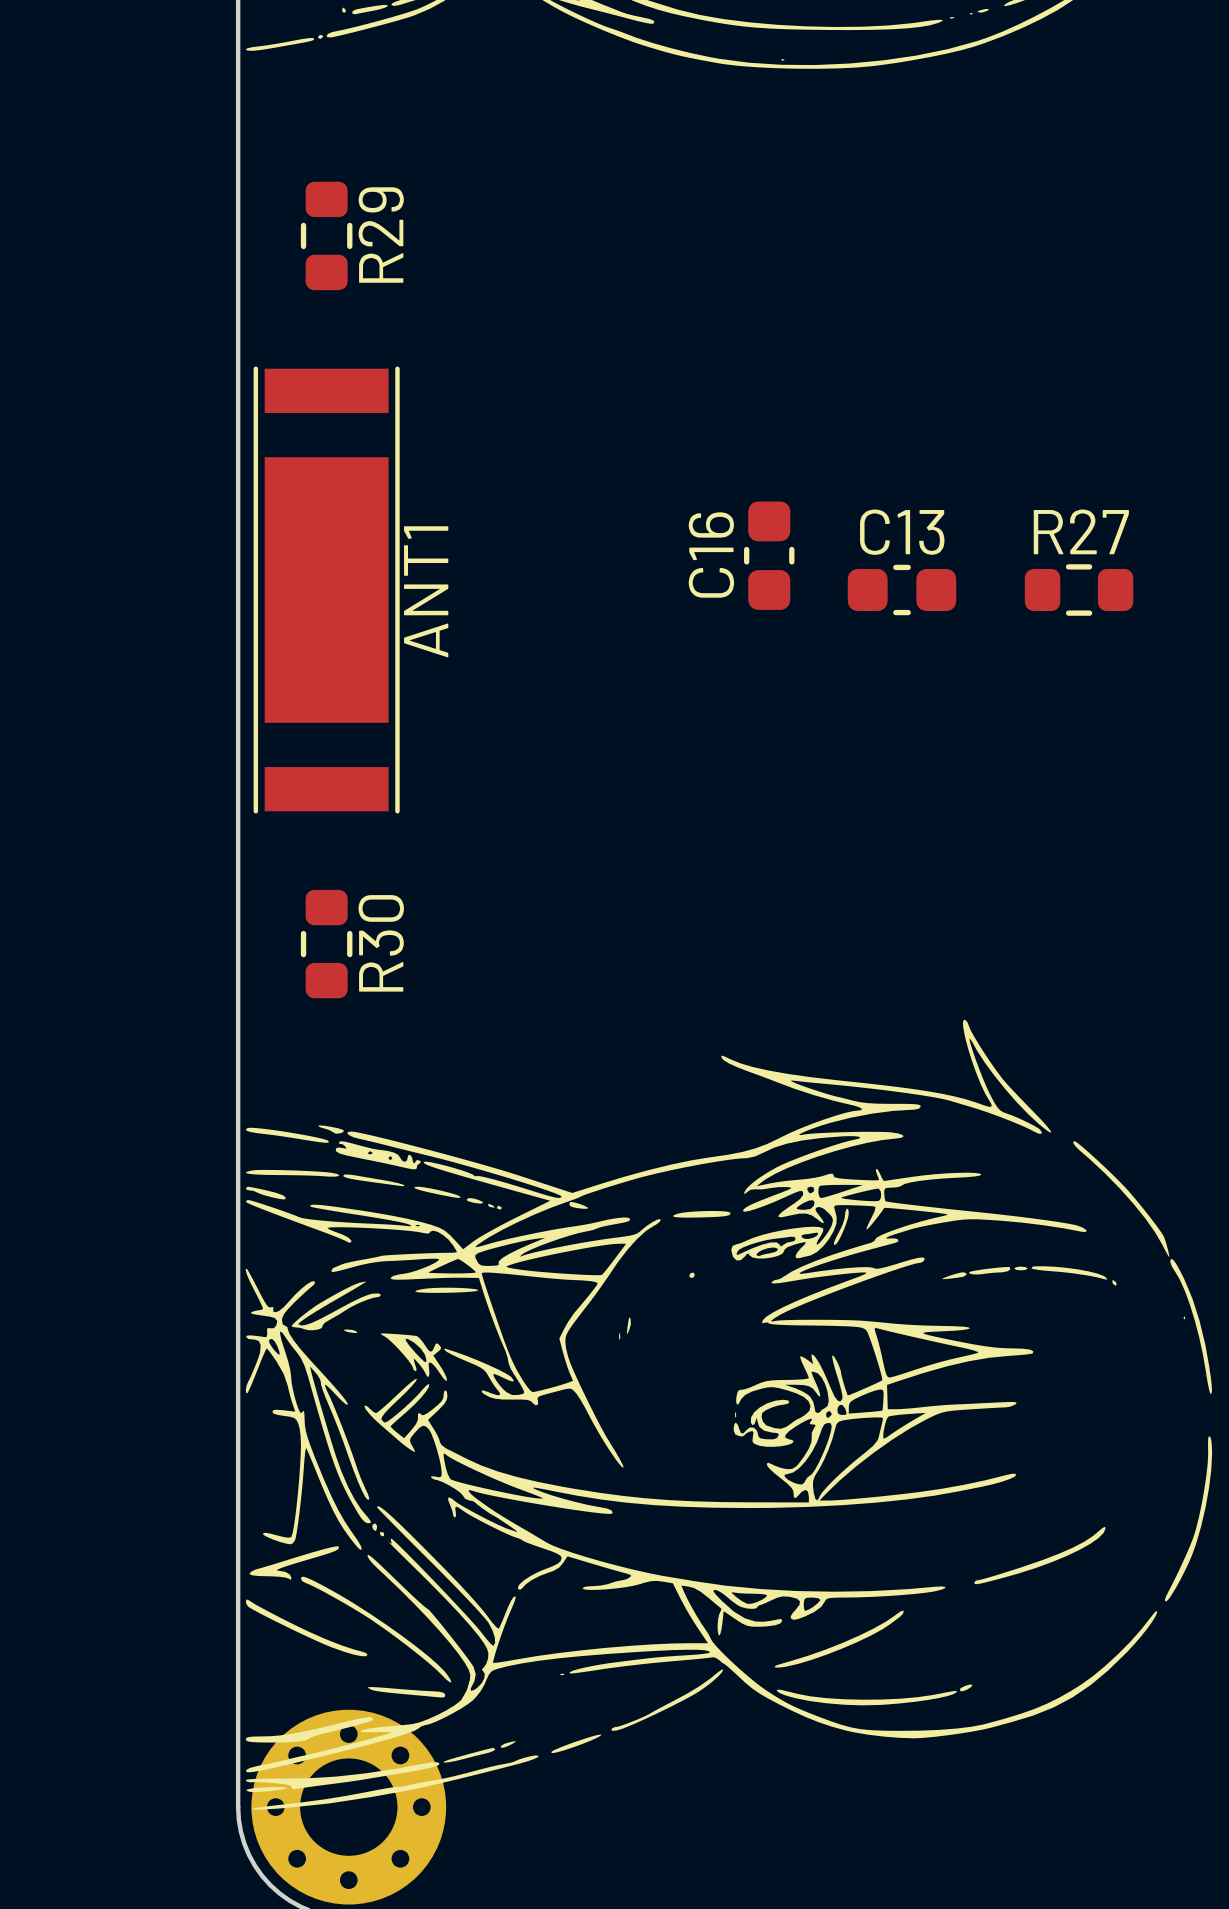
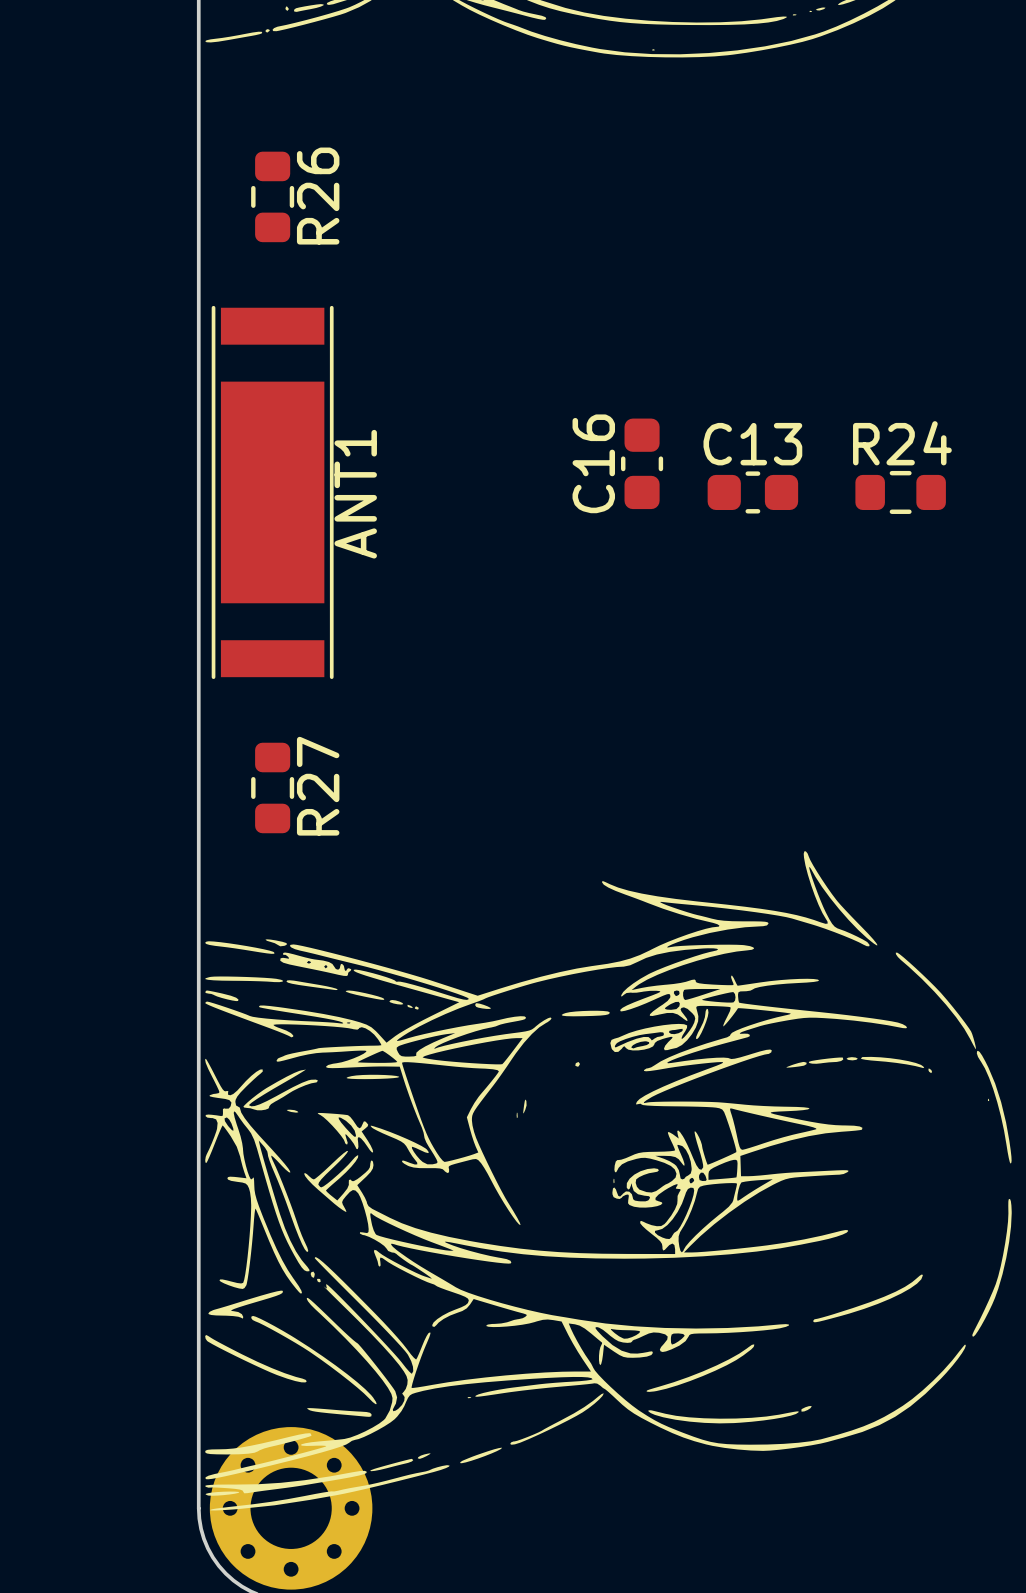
R29 name: R29 (381, 235) -> R26 (318, 196)
R27 name: R27 (1081, 531) -> R24 (902, 443)
R30 name: R30 (381, 943) -> R27 (318, 786)

